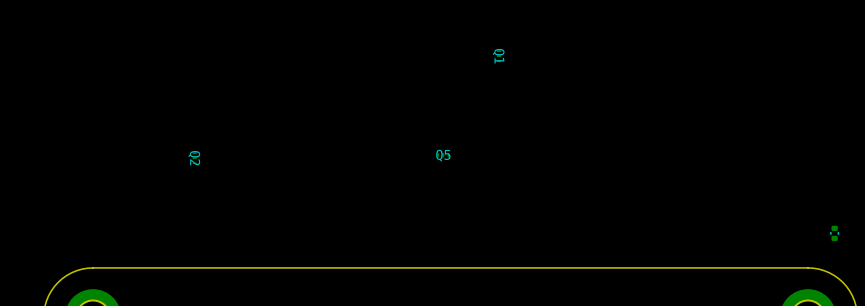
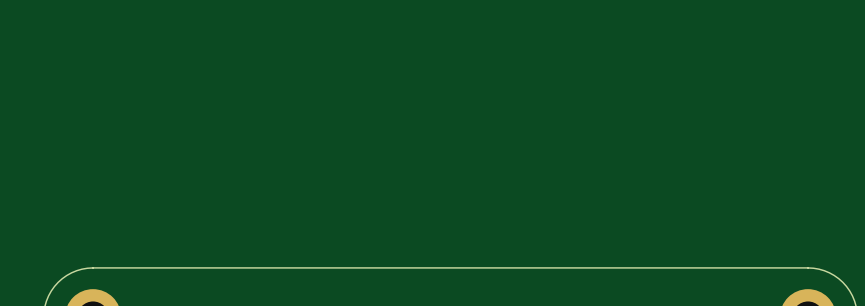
Q1: (499, 56) -> none
Q5: (443, 155) -> none
Q2: (194, 158) -> none
part: (834, 233) -> none

